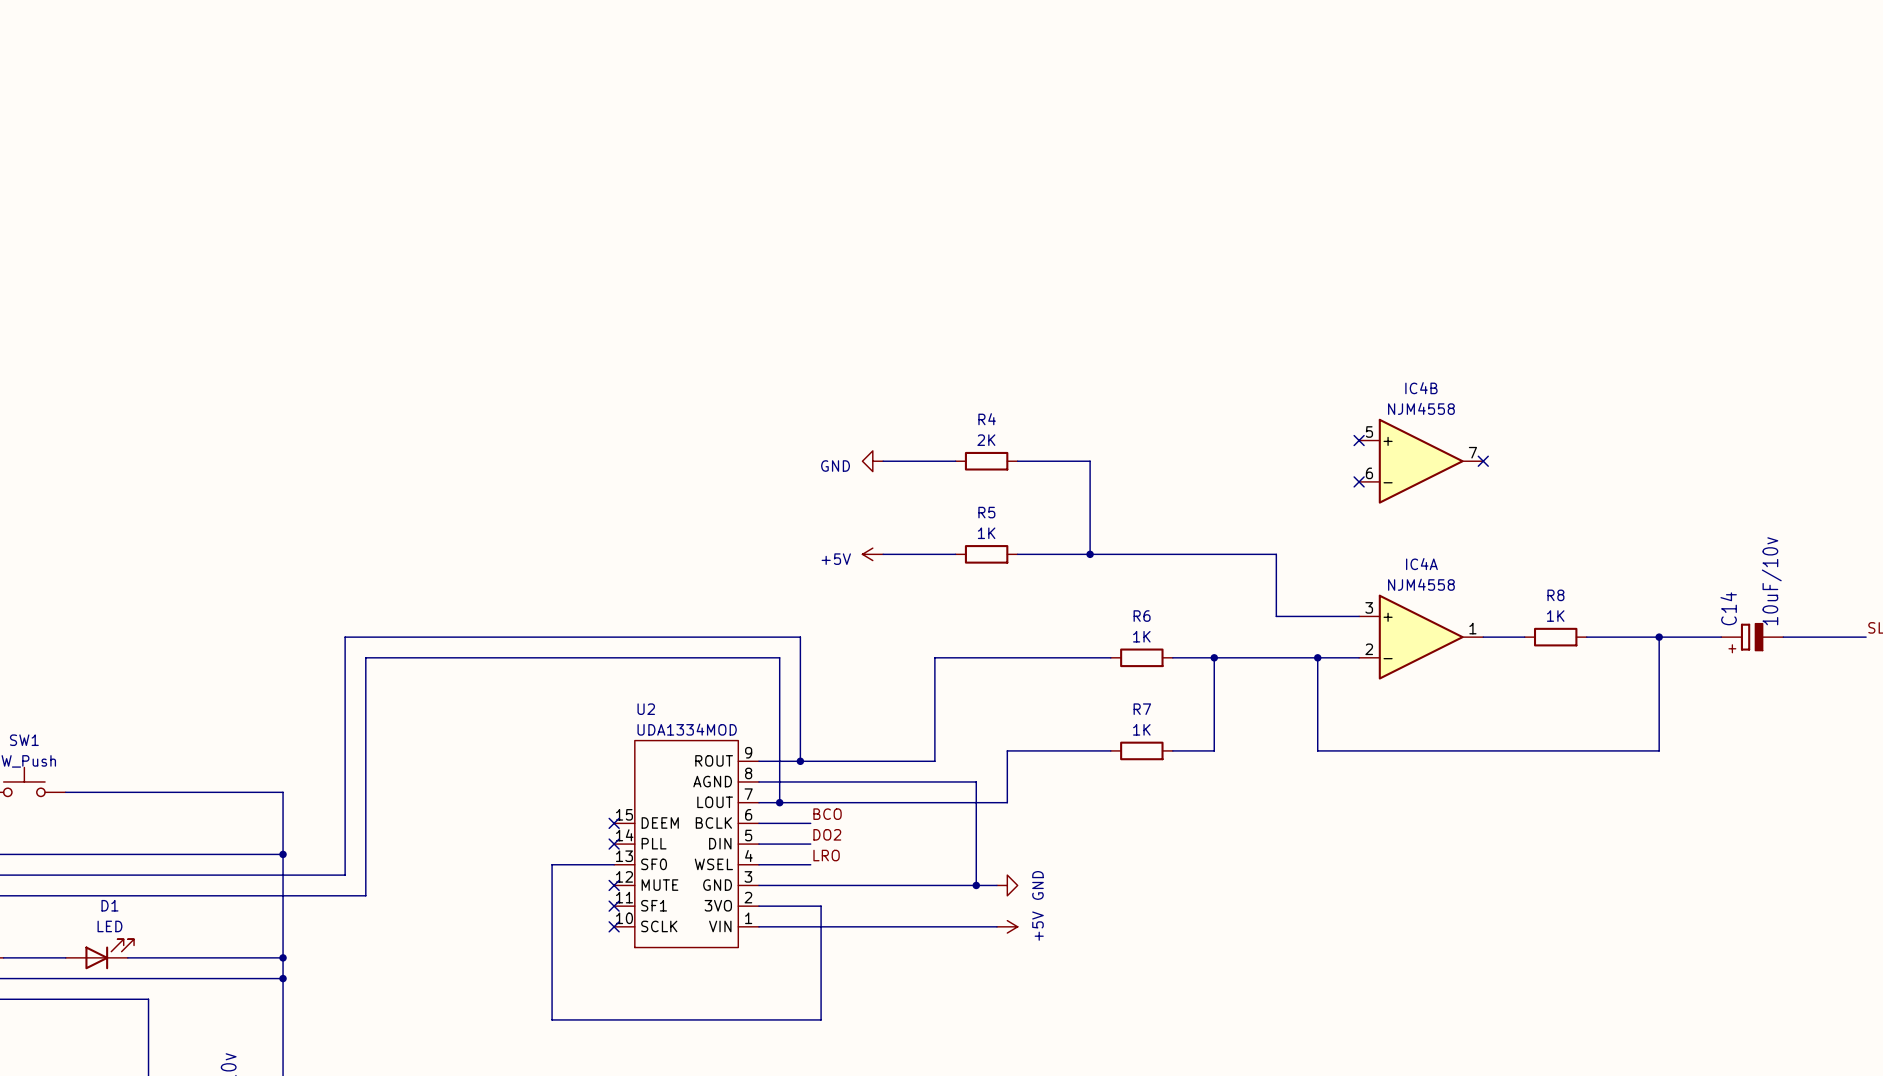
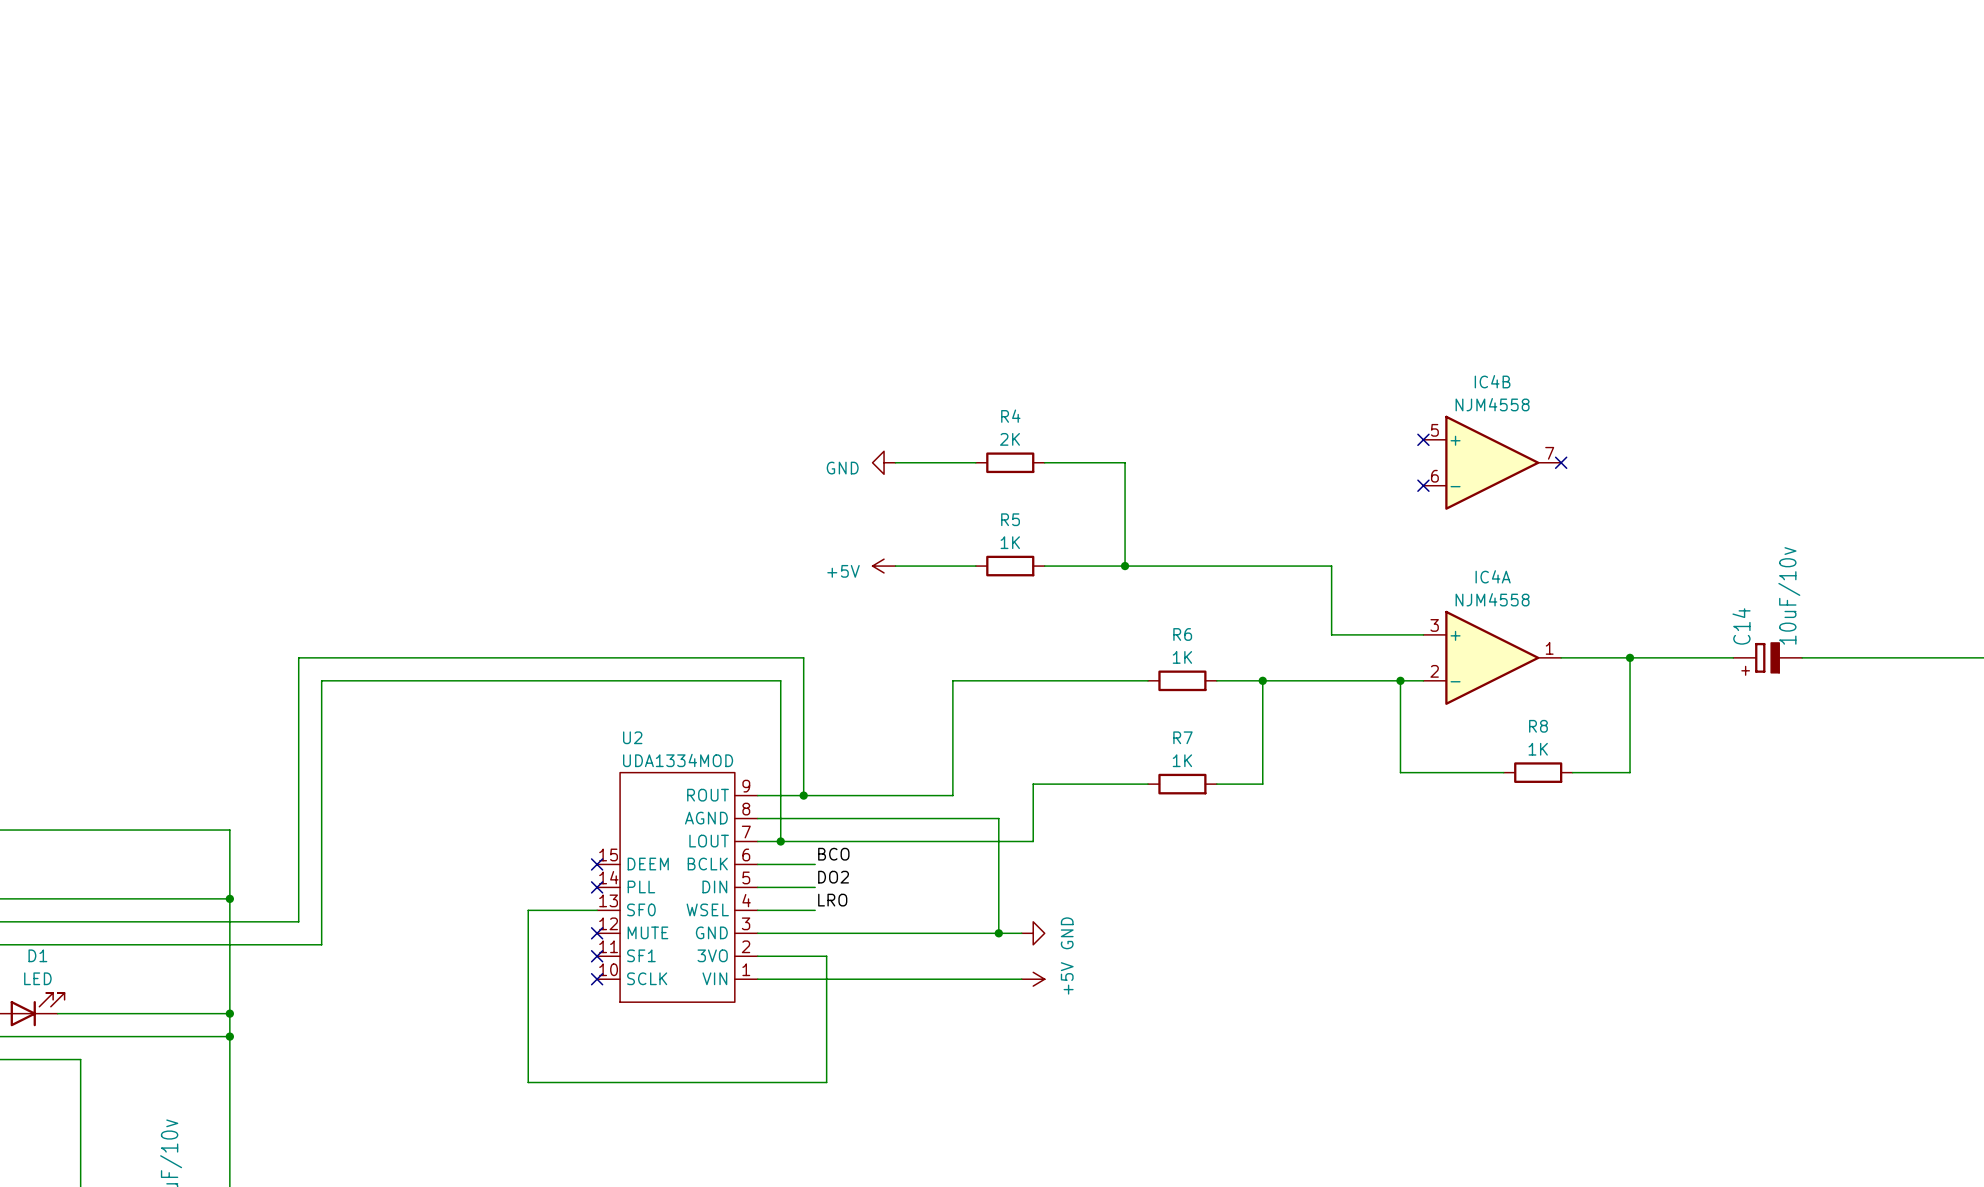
wire: none -> (1607, 657) (1675, 657)
wire: none -> (1630, 657) (1630, 772) (1572, 772)
junction: none -> (1630, 657)
R8 position: (1555, 637) -> (1538, 772)
wire: (1659, 637) (1659, 750) (1317, 750) (1317, 657) -> none
junction: (1659, 637) -> none
C14 position: (1752, 637) -> (1767, 657)
junction position: (1317, 657) -> (1400, 680)
wire: none -> (1400, 680) (1400, 772) (1503, 772)

